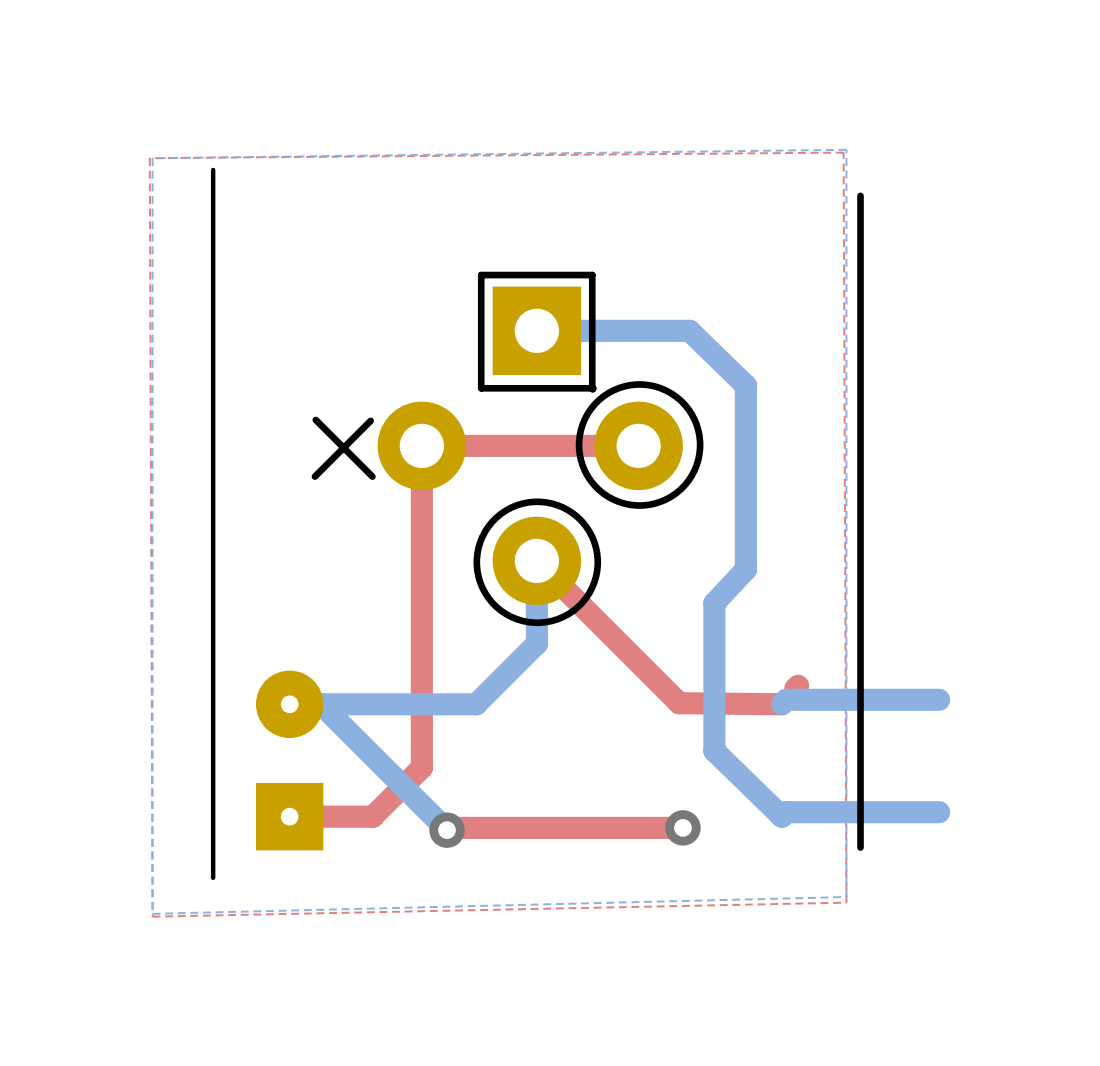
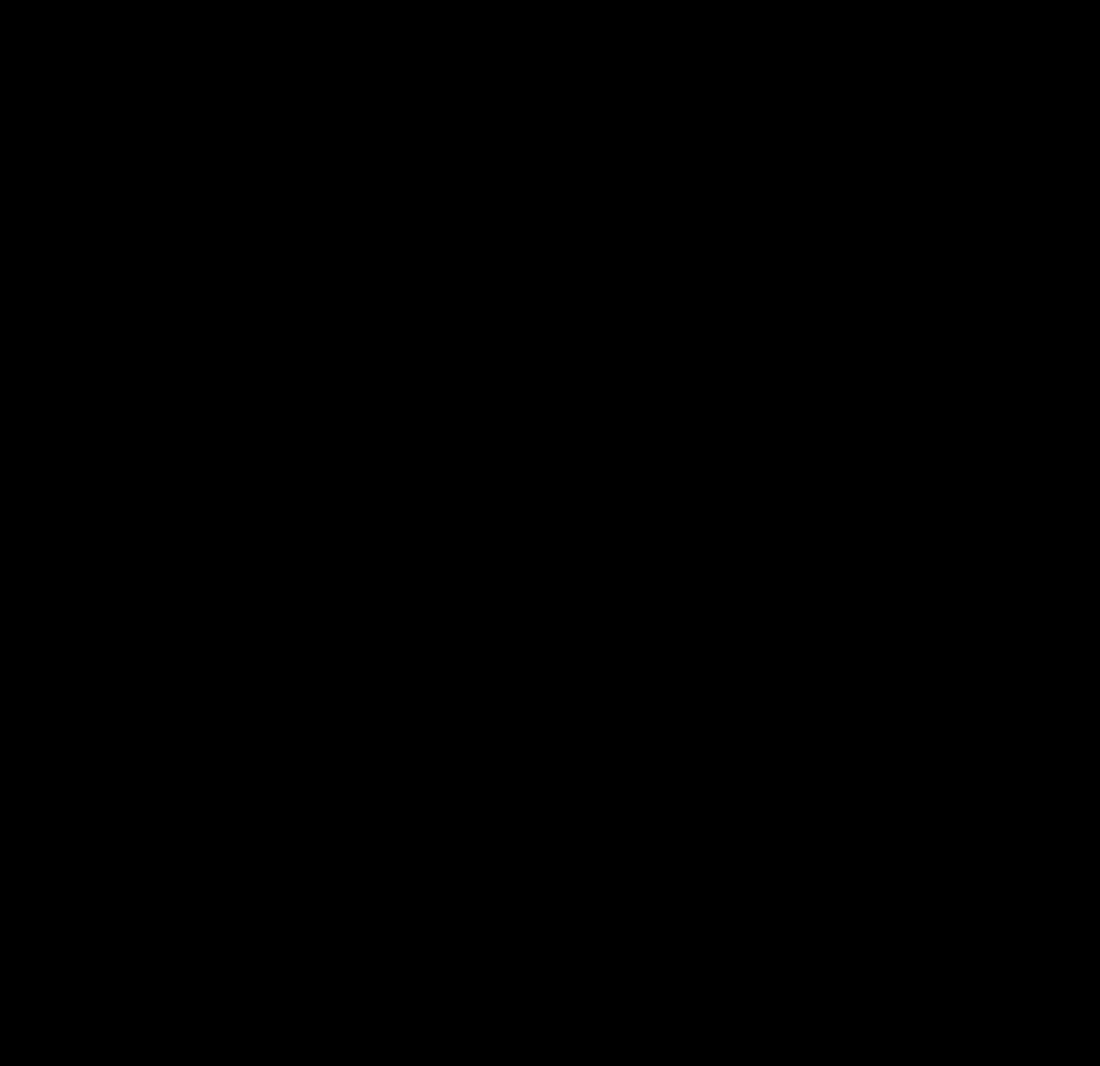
bottom zone outline: (846, 149) (846, 897) (152, 913) (152, 158) (846, 149) -> none
top zone outline: (843, 152) (846, 902) (152, 916) (149, 158) (843, 152) -> none
board edge: (213, 169) (213, 877) -> none
line: (860, 195) (860, 847) -> none
bottom track: (536, 330) (689, 330) (745, 385) (745, 569) (714, 603) (714, 750) (781, 816) (786, 812) (939, 812) -> none
drawing: [473, 381, 704, 627] -> none
line: (593, 388) (481, 388) (481, 275) (592, 275) (592, 389) -> none
line: (315, 419) (372, 476) -> none
line: (370, 420) (314, 476) -> none
part: (530, 445) -> none
top track: (638, 445) (421, 445) (421, 767) (372, 816) (289, 816) -> none
bottom track: (536, 560) (536, 643) (476, 704) (289, 704) -> none
top track: (536, 560) (679, 703) (781, 704) -> none
top track: (798, 685) (795, 688) -> none
bottom track: (939, 699) (786, 699) (781, 704) -> none
bottom track: (321, 704) (446, 830) -> none
part: (289, 760) -> none
top track: (682, 827) (449, 827) (446, 830) -> none
via: (682, 827) -> none
via: (446, 830) -> none

